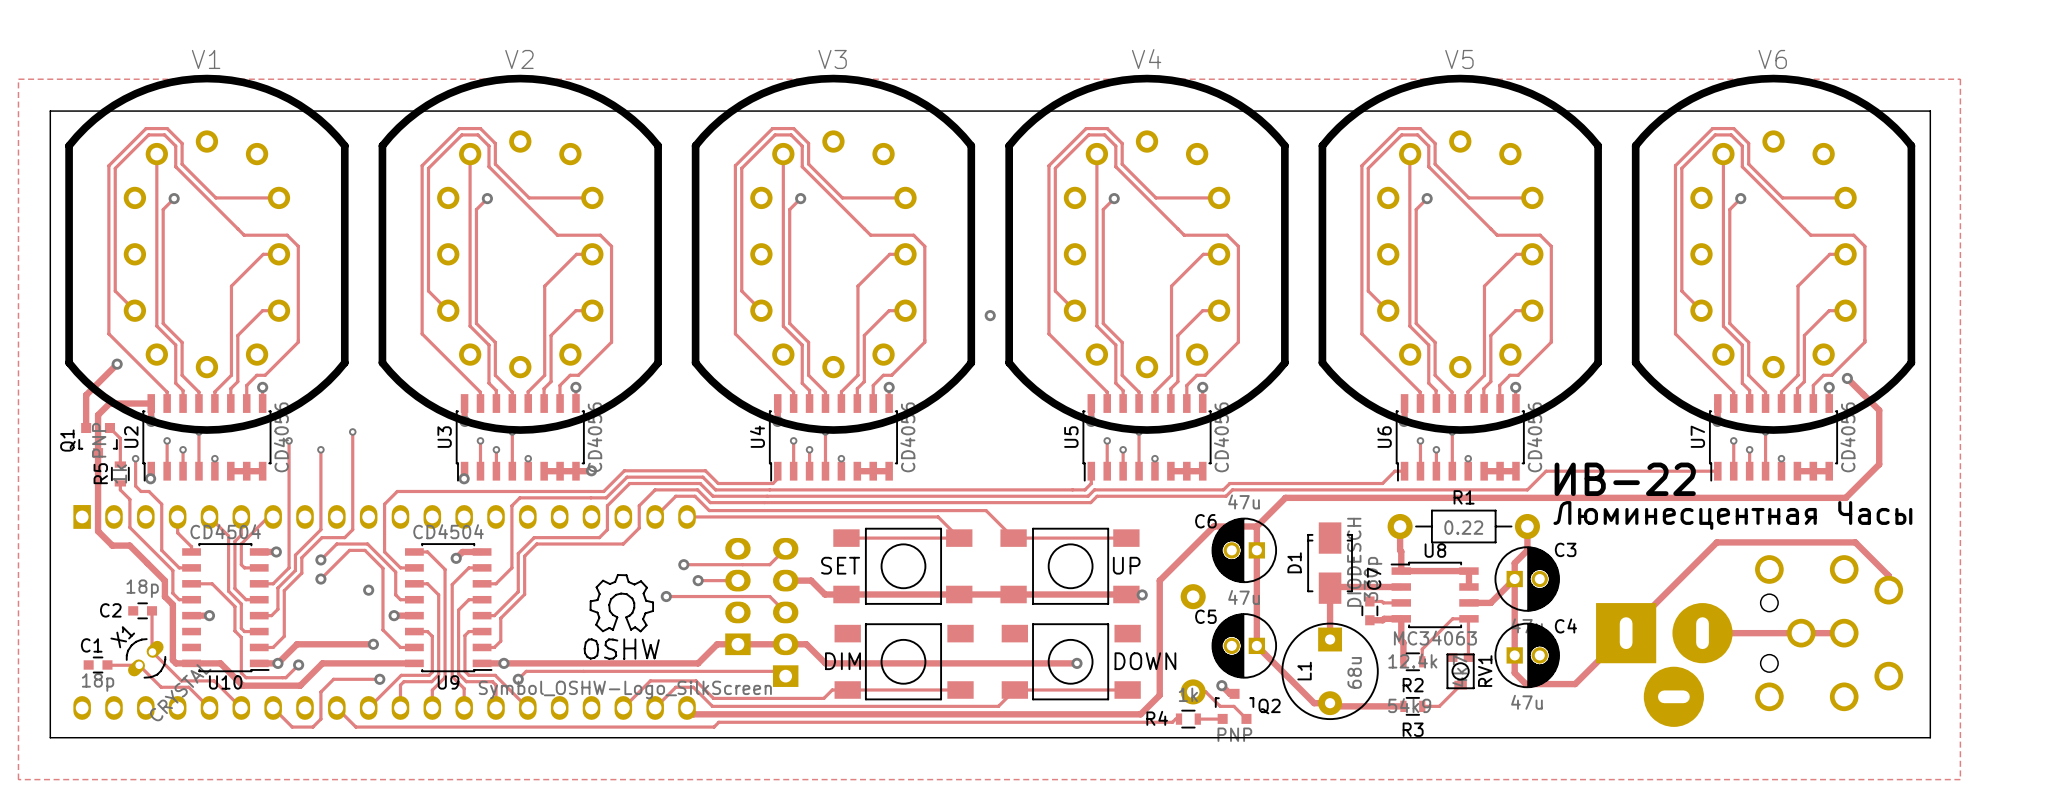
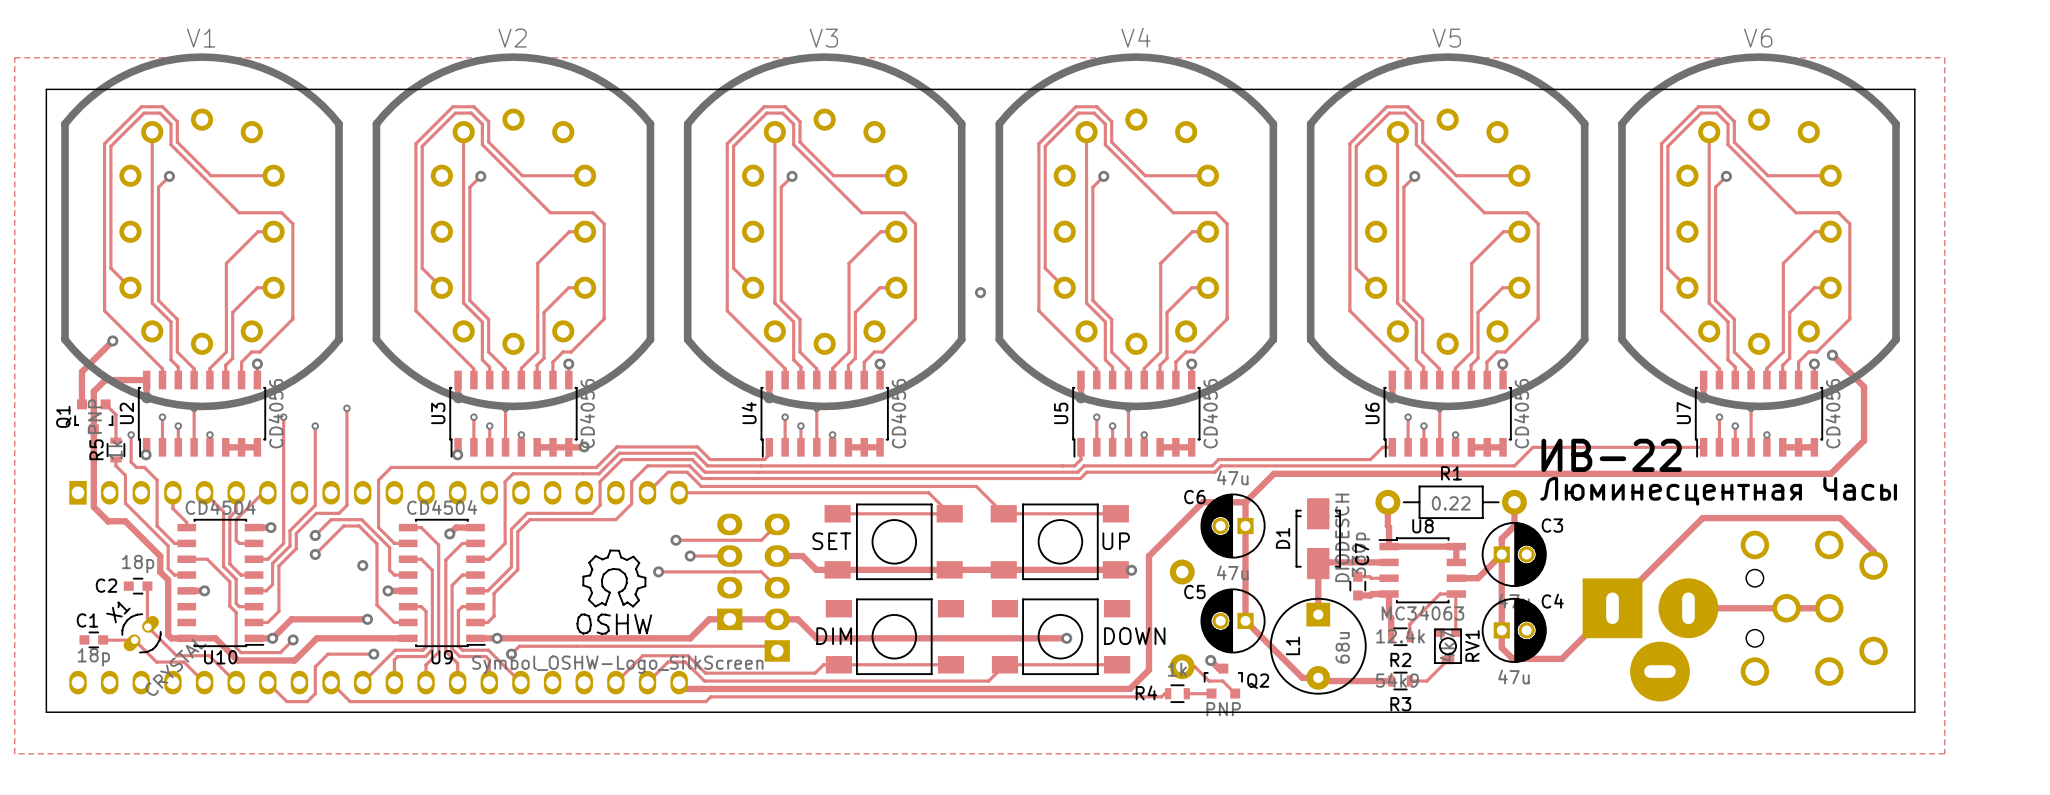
V1 footprint: [65, 74, 349, 434] -> [61, 53, 343, 411]
V2 footprint: [378, 74, 662, 434] -> [372, 53, 655, 411]
V3 footprint: [691, 74, 976, 434] -> [683, 53, 966, 411]
V4 footprint: [1005, 74, 1289, 434] -> [995, 53, 1278, 411]
V5 footprint: [1318, 74, 1602, 434] -> [1306, 53, 1589, 411]
V6 footprint: [1631, 74, 1916, 434] -> [1618, 53, 1900, 411]

